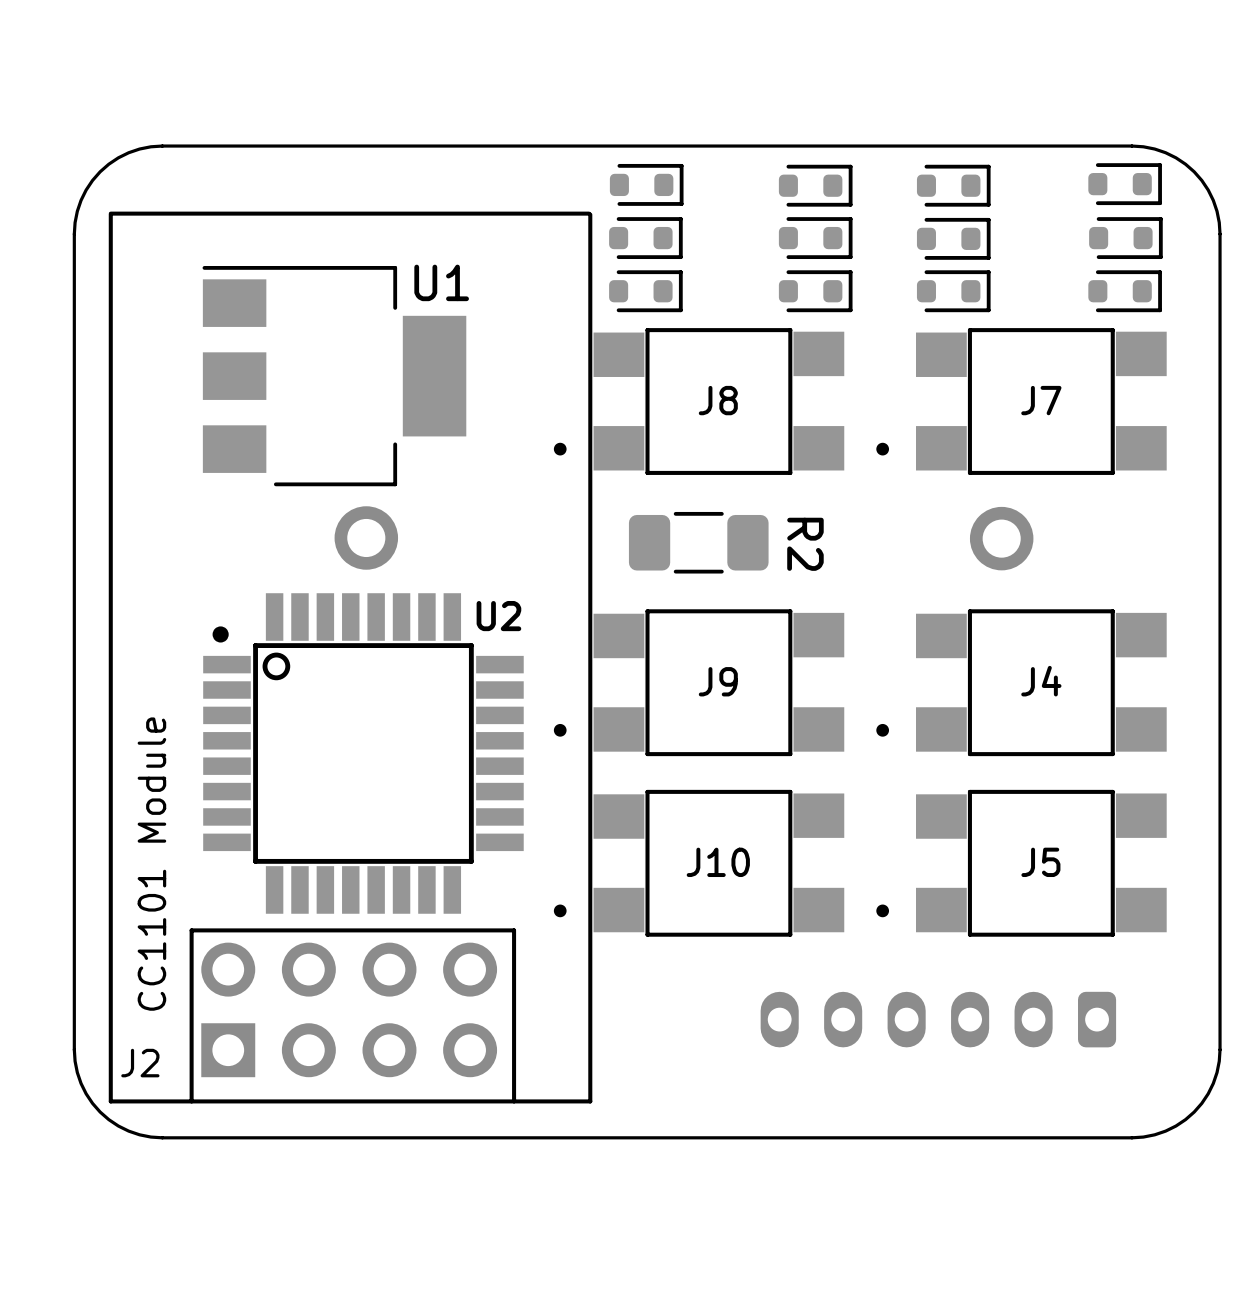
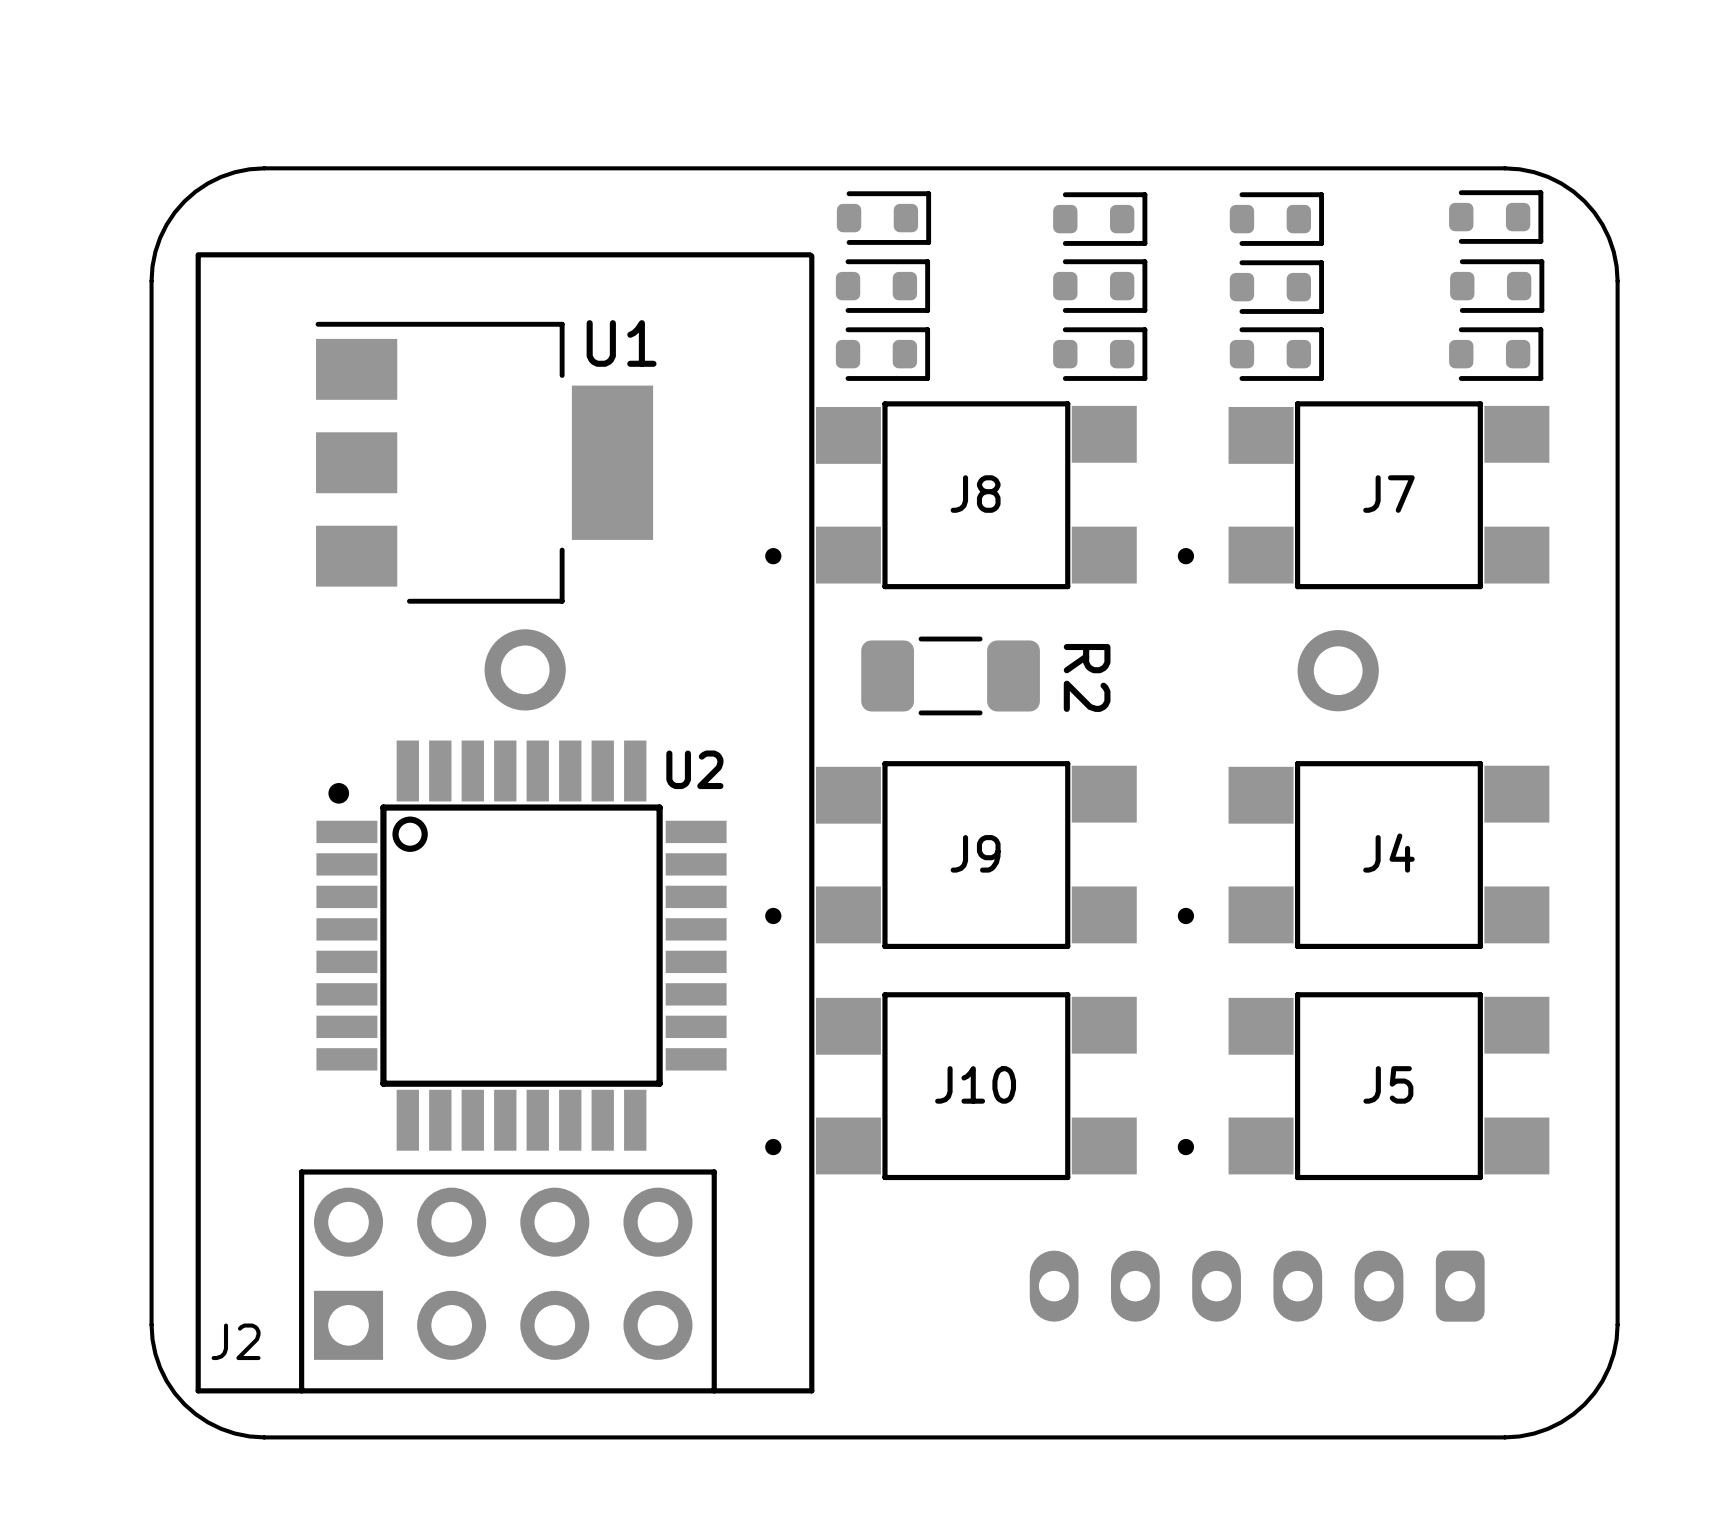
J2 value: CC1101 Module (151, 864) -> none

